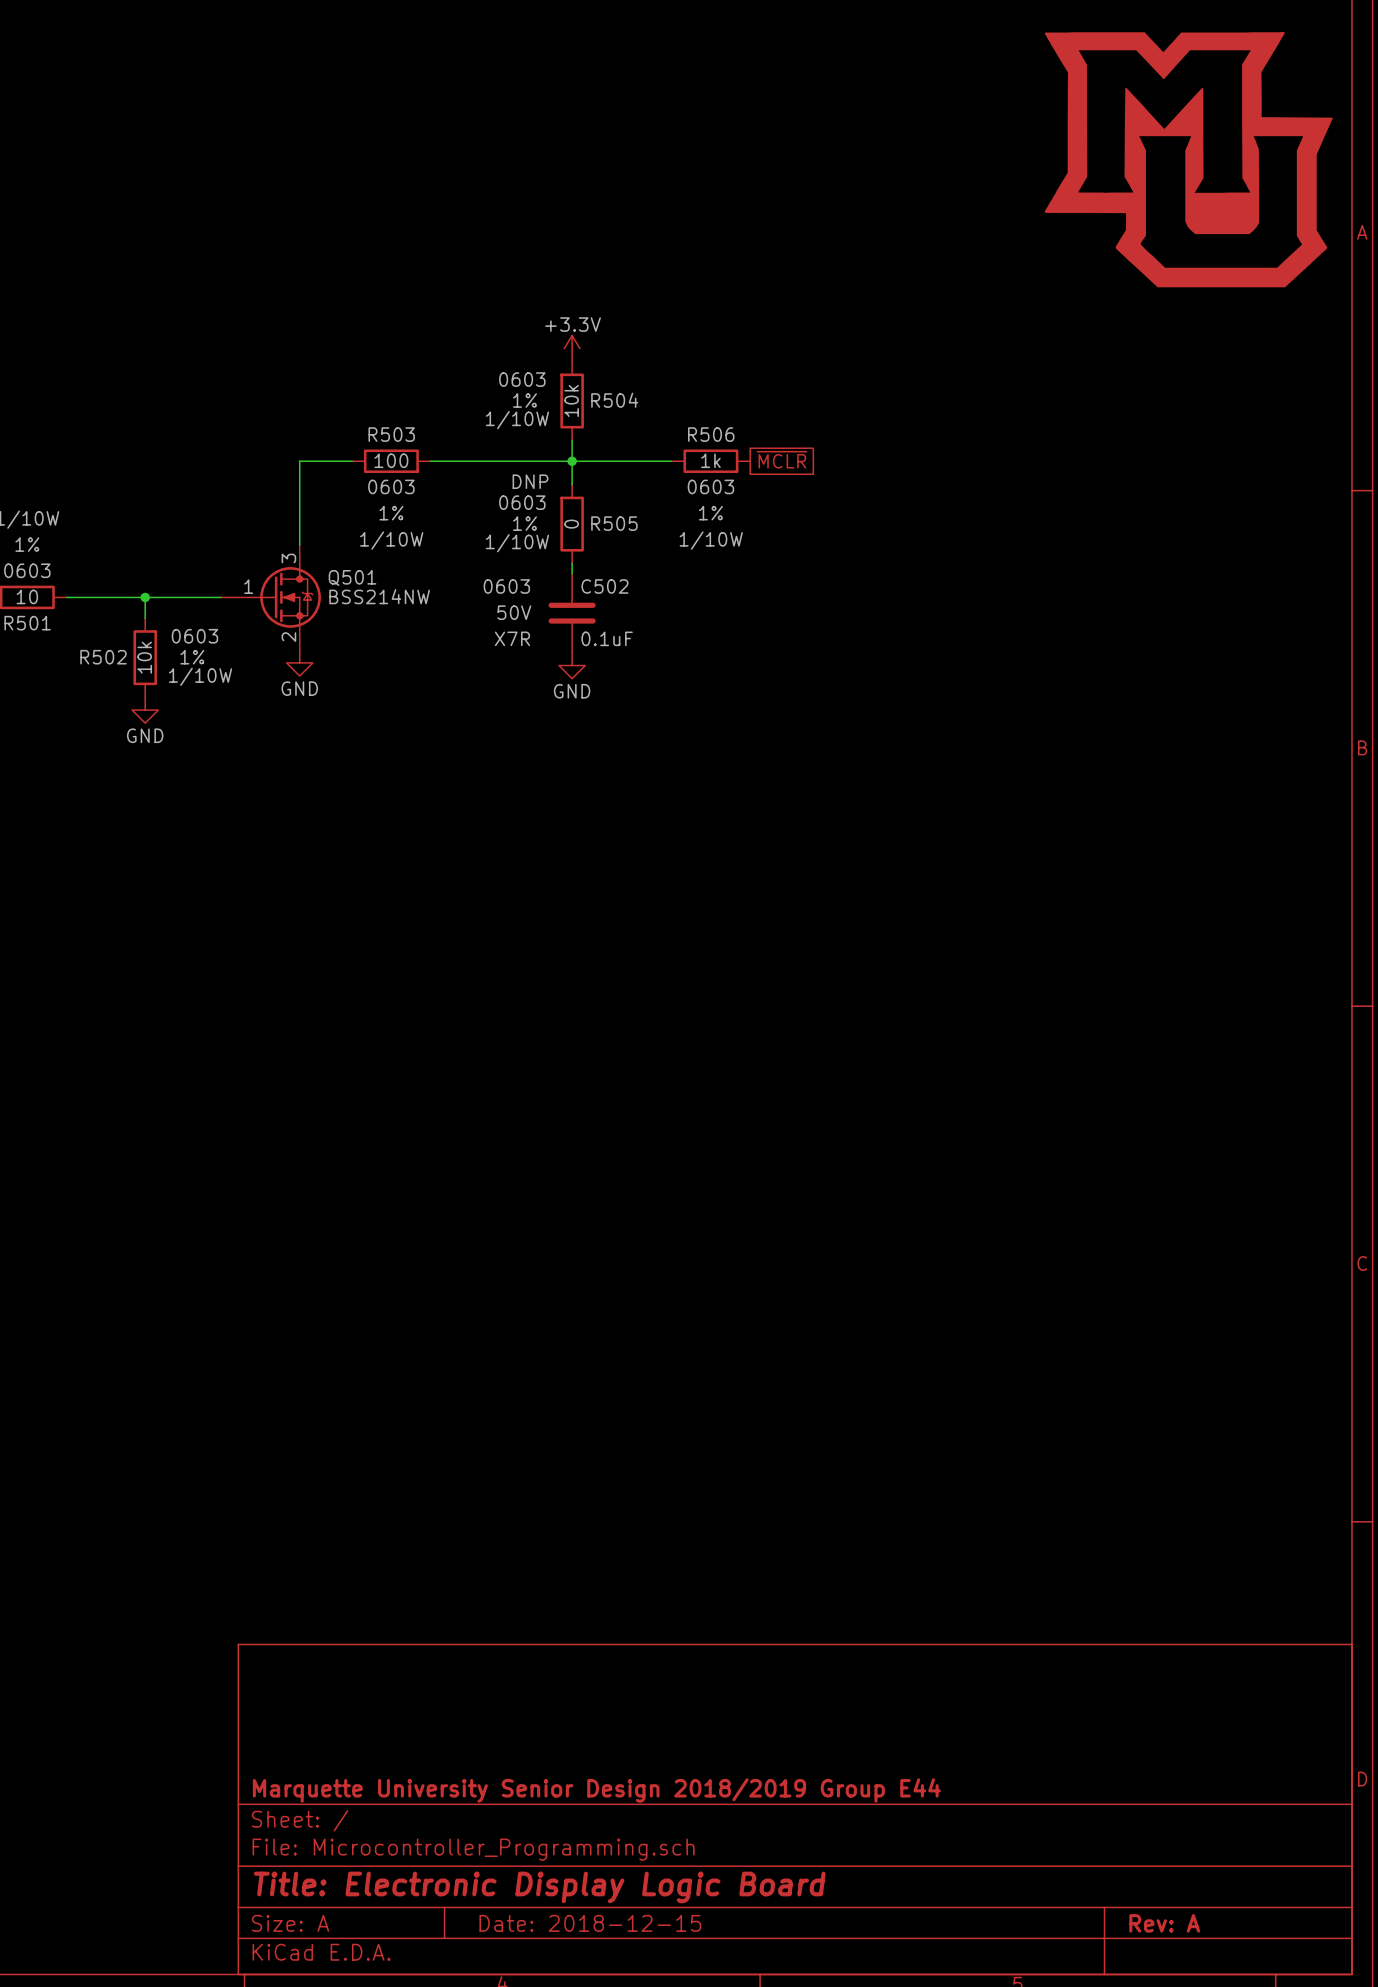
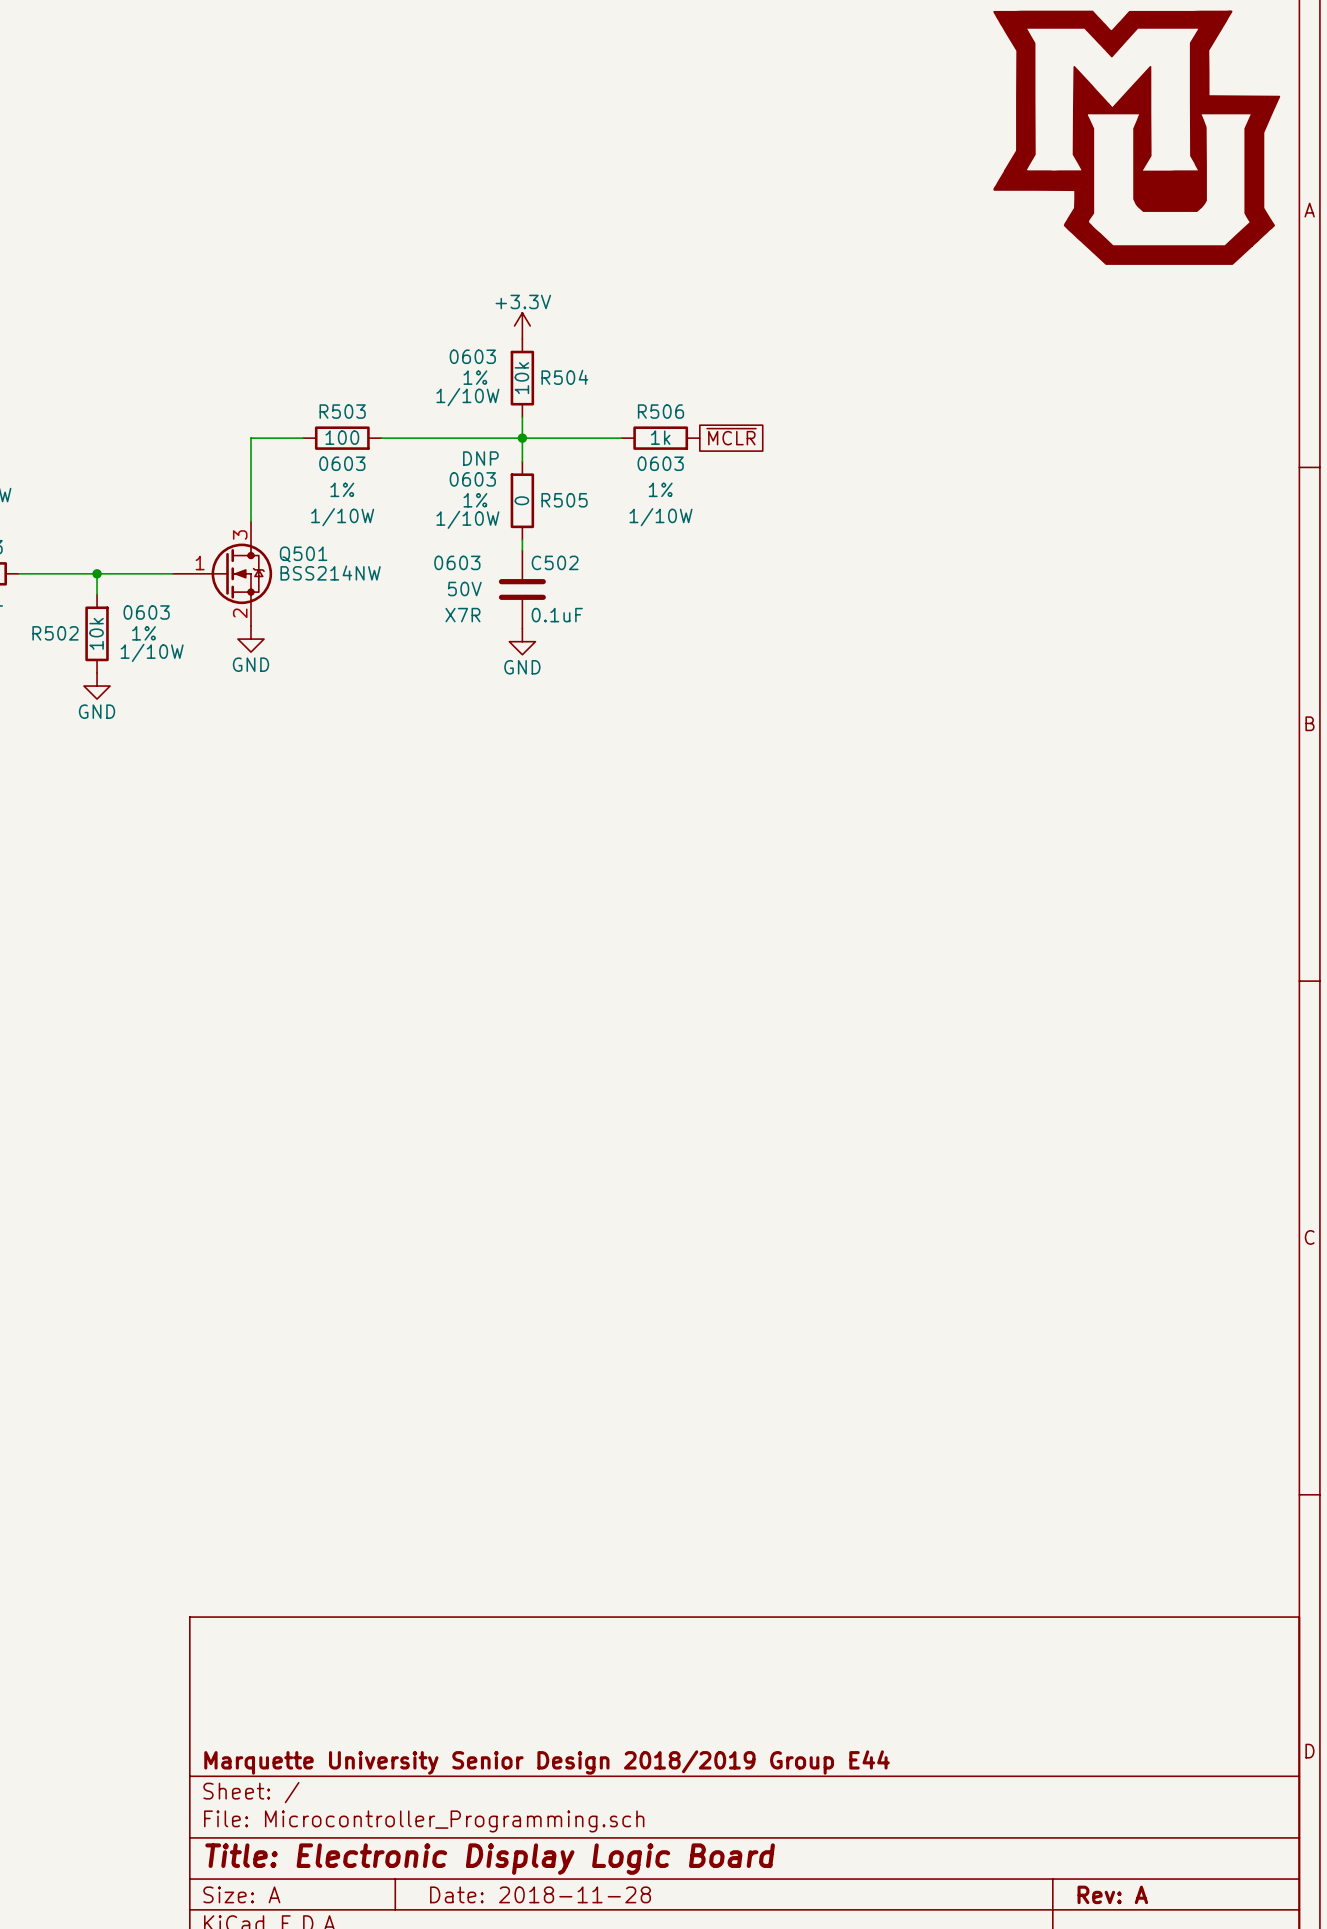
title block: Date: 2018-12-15 (590, 1923) -> Date: 2018-11-28 (540, 1894)

